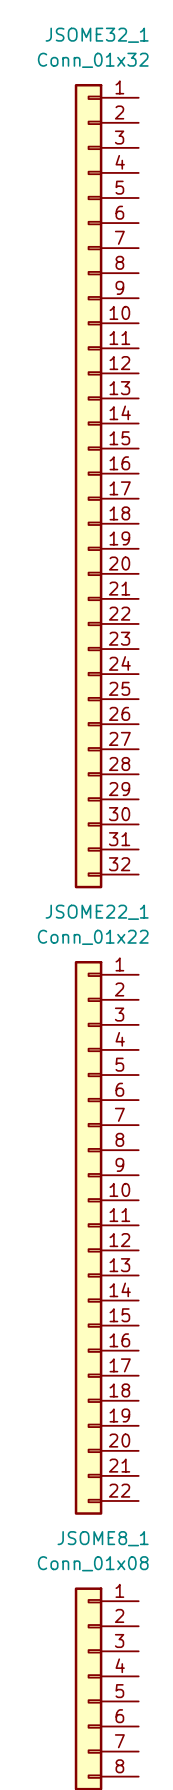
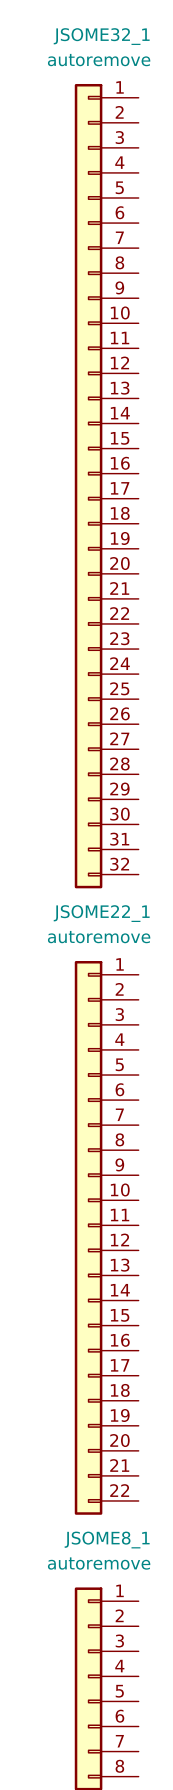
JSOME32_1 value: Conn_01x32 (93, 60) -> autoremove (99, 60)
JSOME22_1 value: Conn_01x22 (93, 937) -> autoremove (99, 937)
JSOME8_1 value: Conn_01x08 (93, 1563) -> autoremove (99, 1563)

